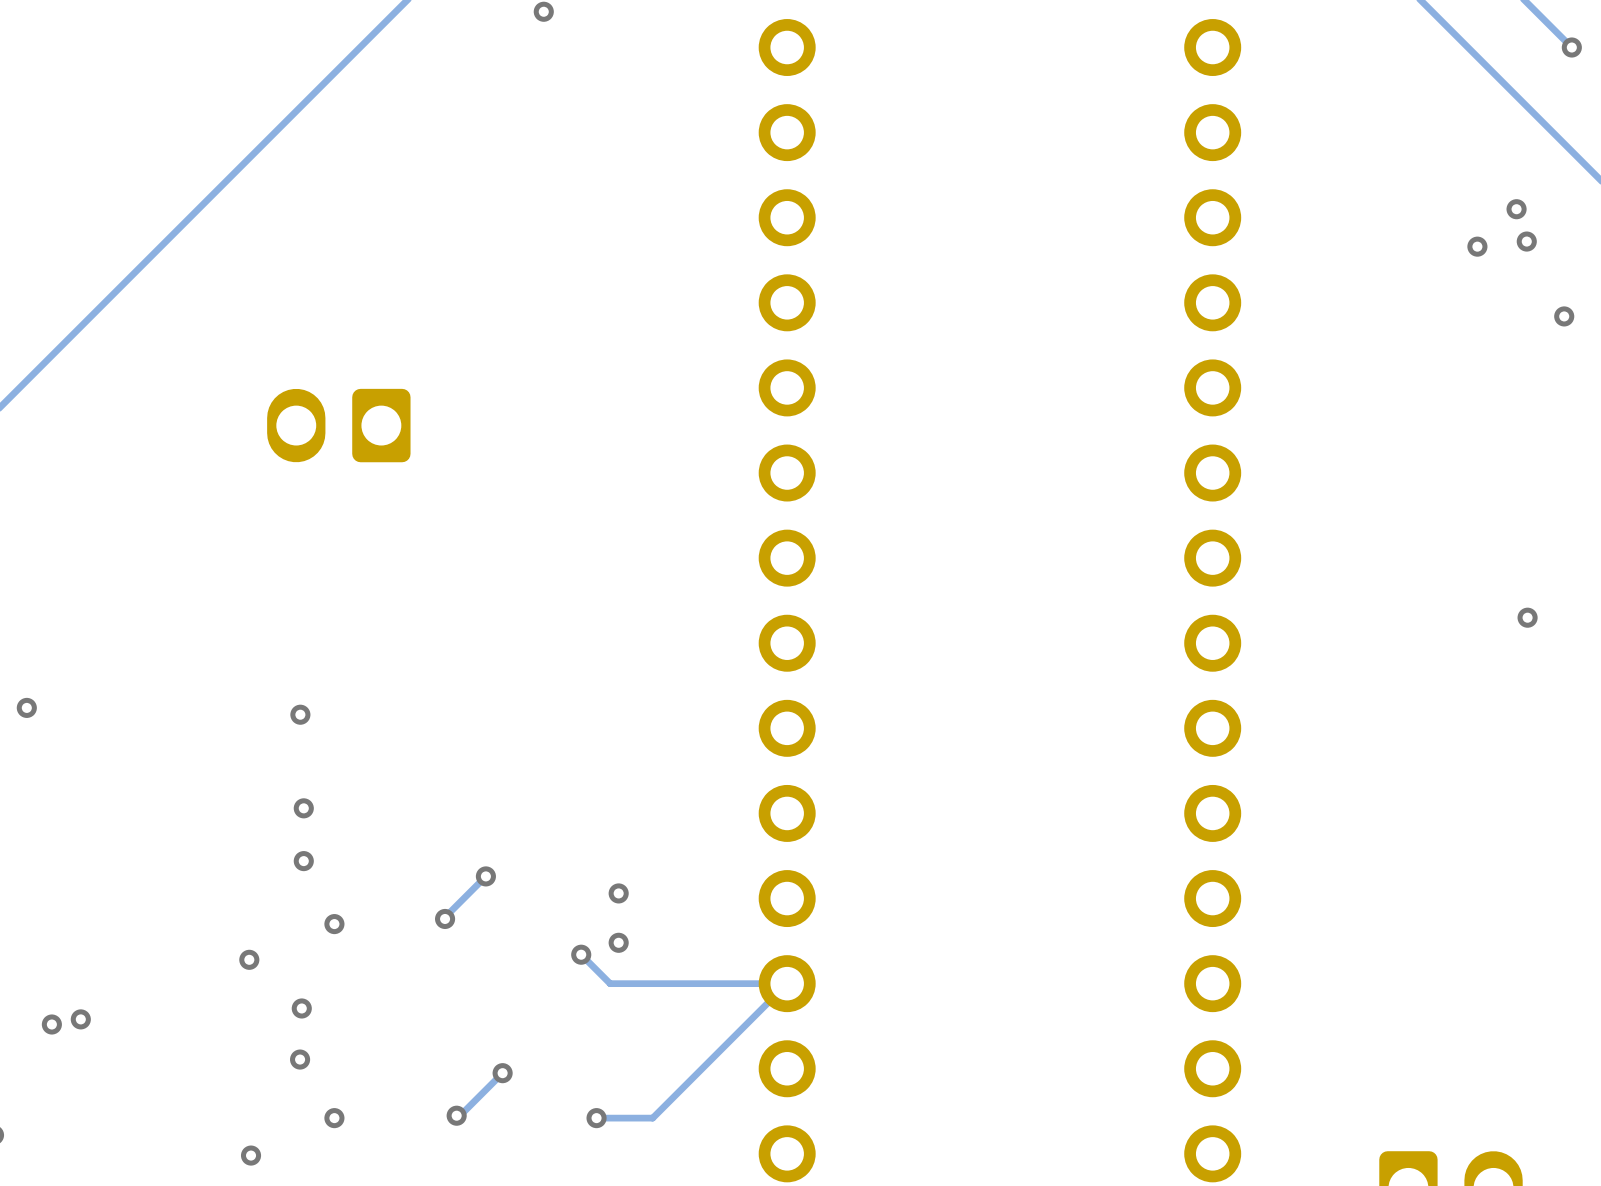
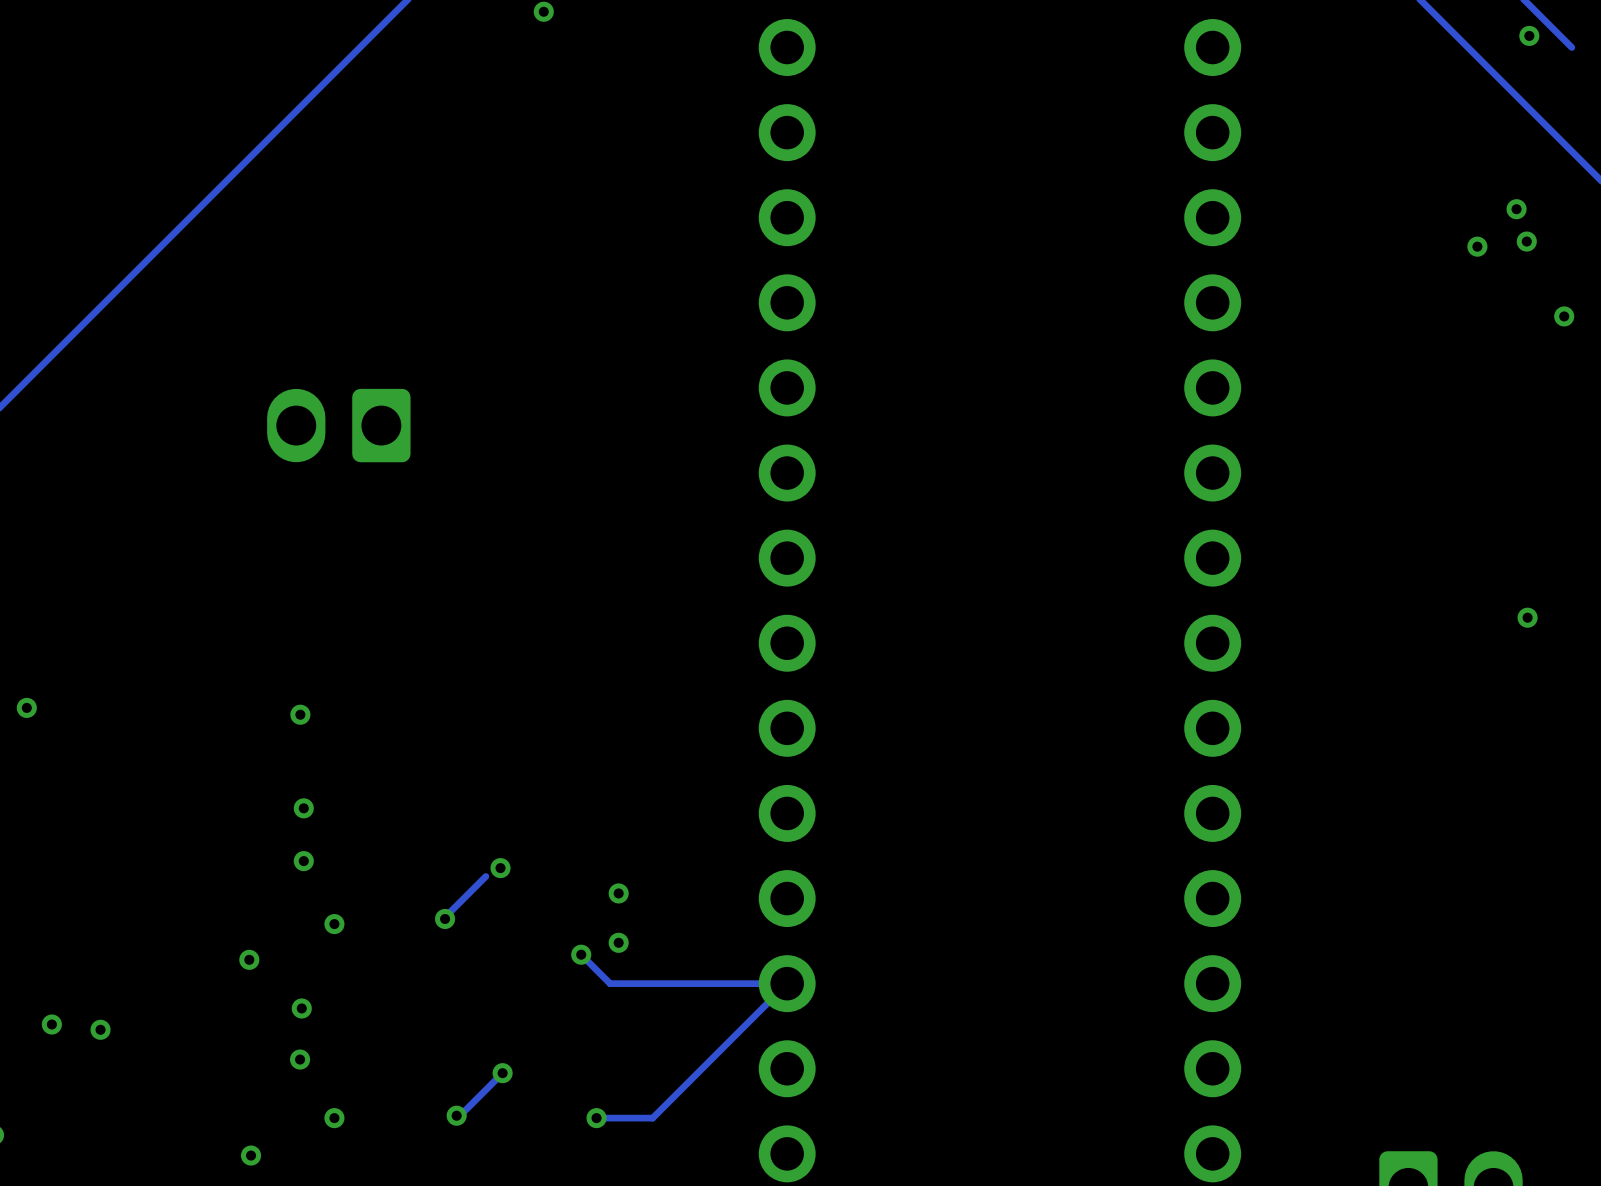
via position: (1571, 47) -> (1529, 35)
via position: (485, 876) -> (500, 868)
via position: (80, 1019) -> (100, 1029)

